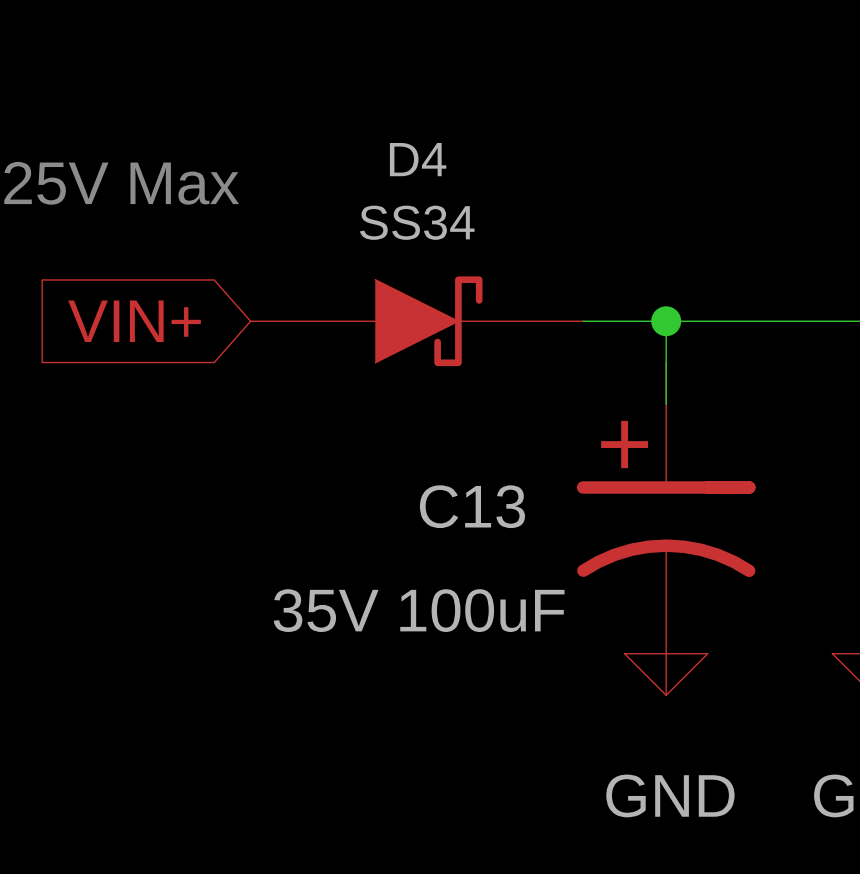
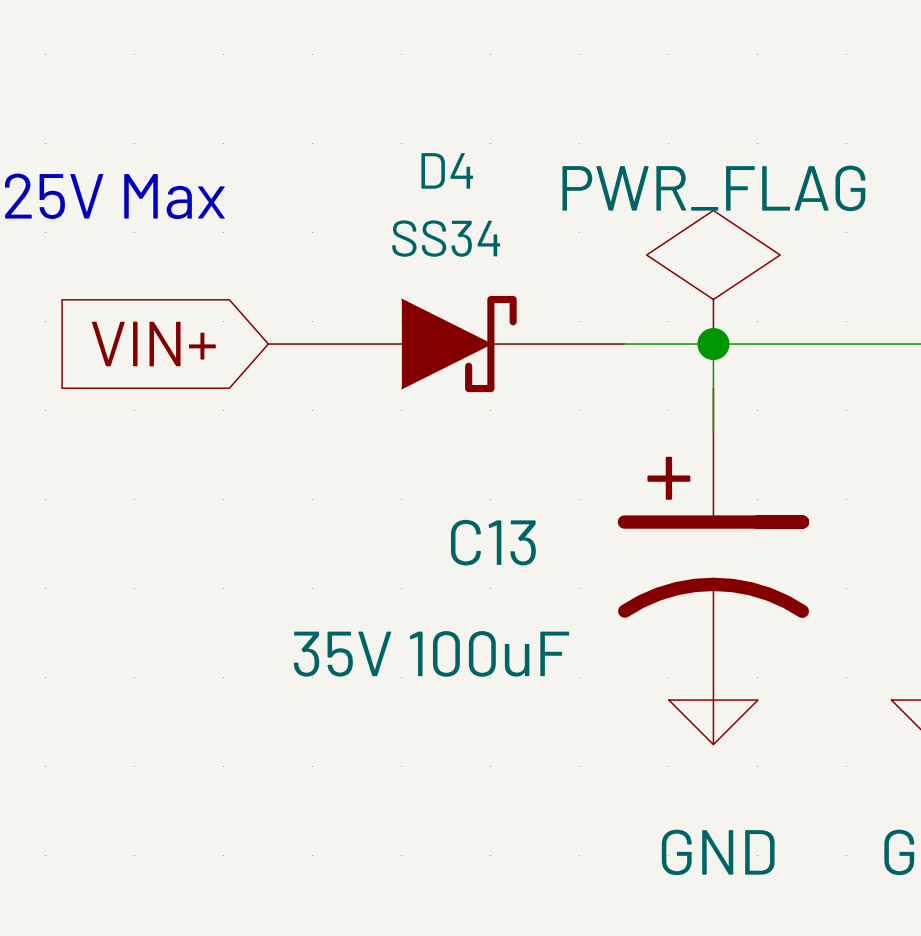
power symbol: none -> PWR_FLAG (713, 277)

